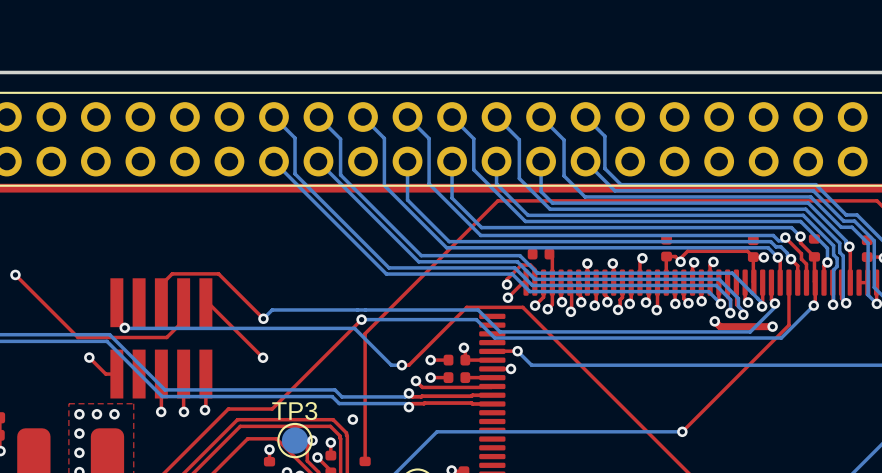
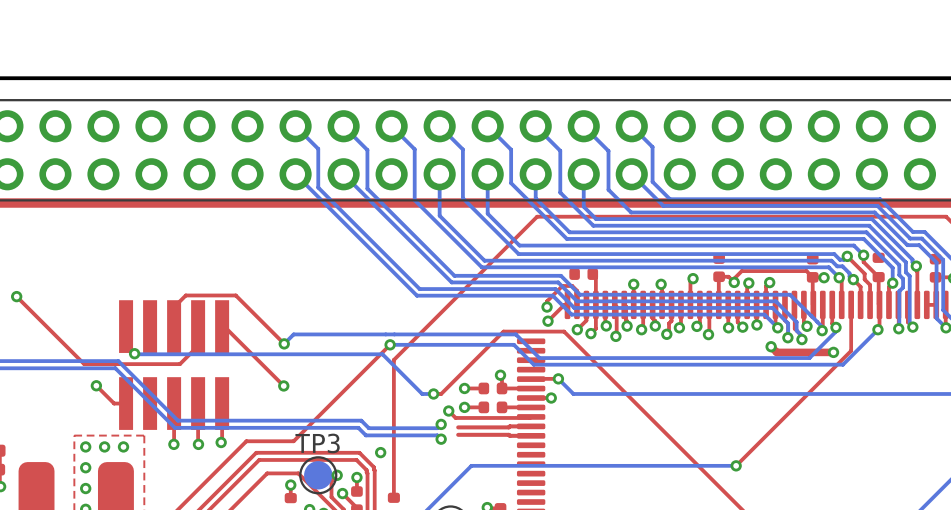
top track: (408, 393) (412, 396) (424, 396) -> none
top track: (424, 403) (412, 403) (408, 407) -> none

